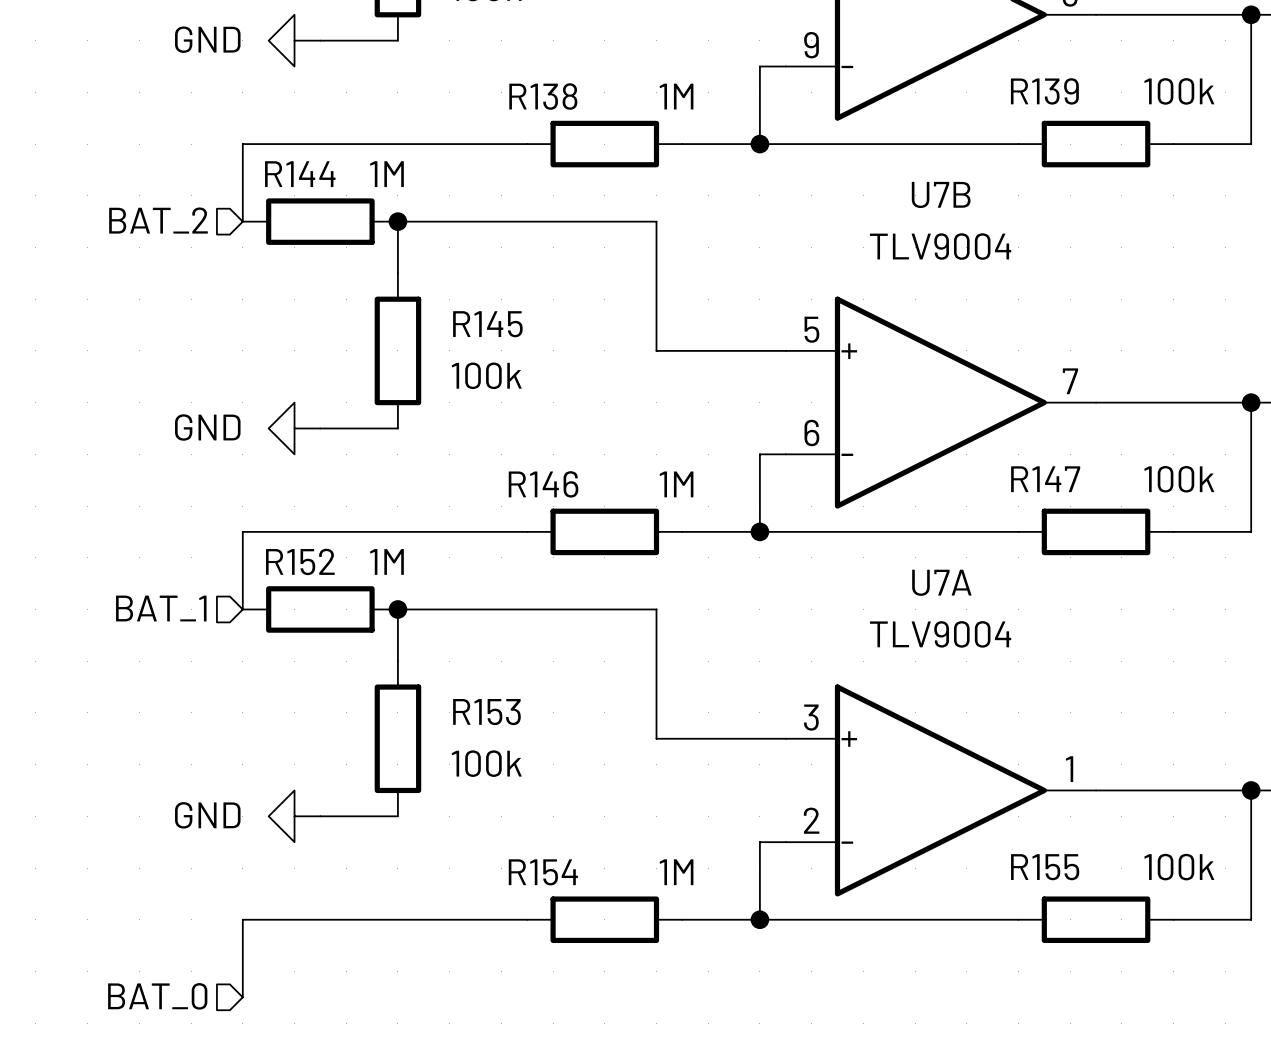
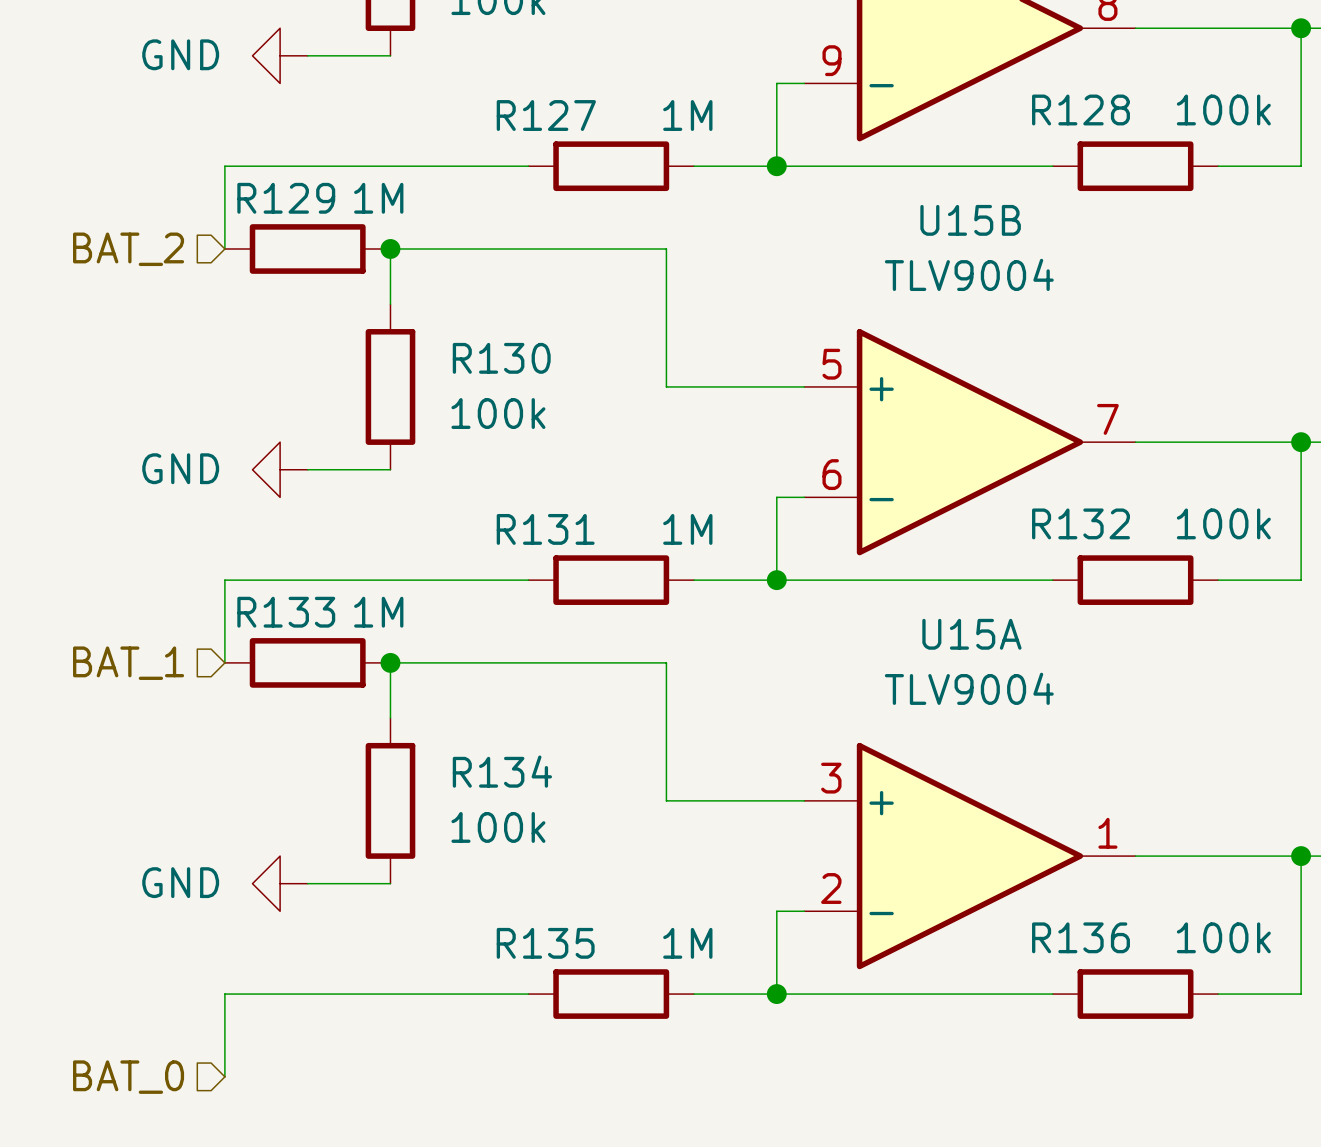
R139 name: R139 (1044, 91) -> R128 (1080, 109)
R138 name: R138 (543, 96) -> R127 (546, 115)
R144 name: R144 (300, 174) -> R129 (286, 198)
U7B name: U7B (941, 194) -> U15B (970, 220)
R145 name: R145 (487, 324) -> R130 (501, 358)
R147 name: R147 (1045, 479) -> R132 (1080, 523)
R146 name: R146 (543, 484) -> R131 (545, 529)
R152 name: R152 (300, 561) -> R133 (286, 612)
U7A name: U7A (941, 582) -> U15A (971, 634)
R153 name: R153 (486, 712) -> R134 (502, 771)
R155 name: R155 (1045, 867) -> R136 (1080, 937)
R154 name: R154 (543, 872) -> R135 (545, 943)

